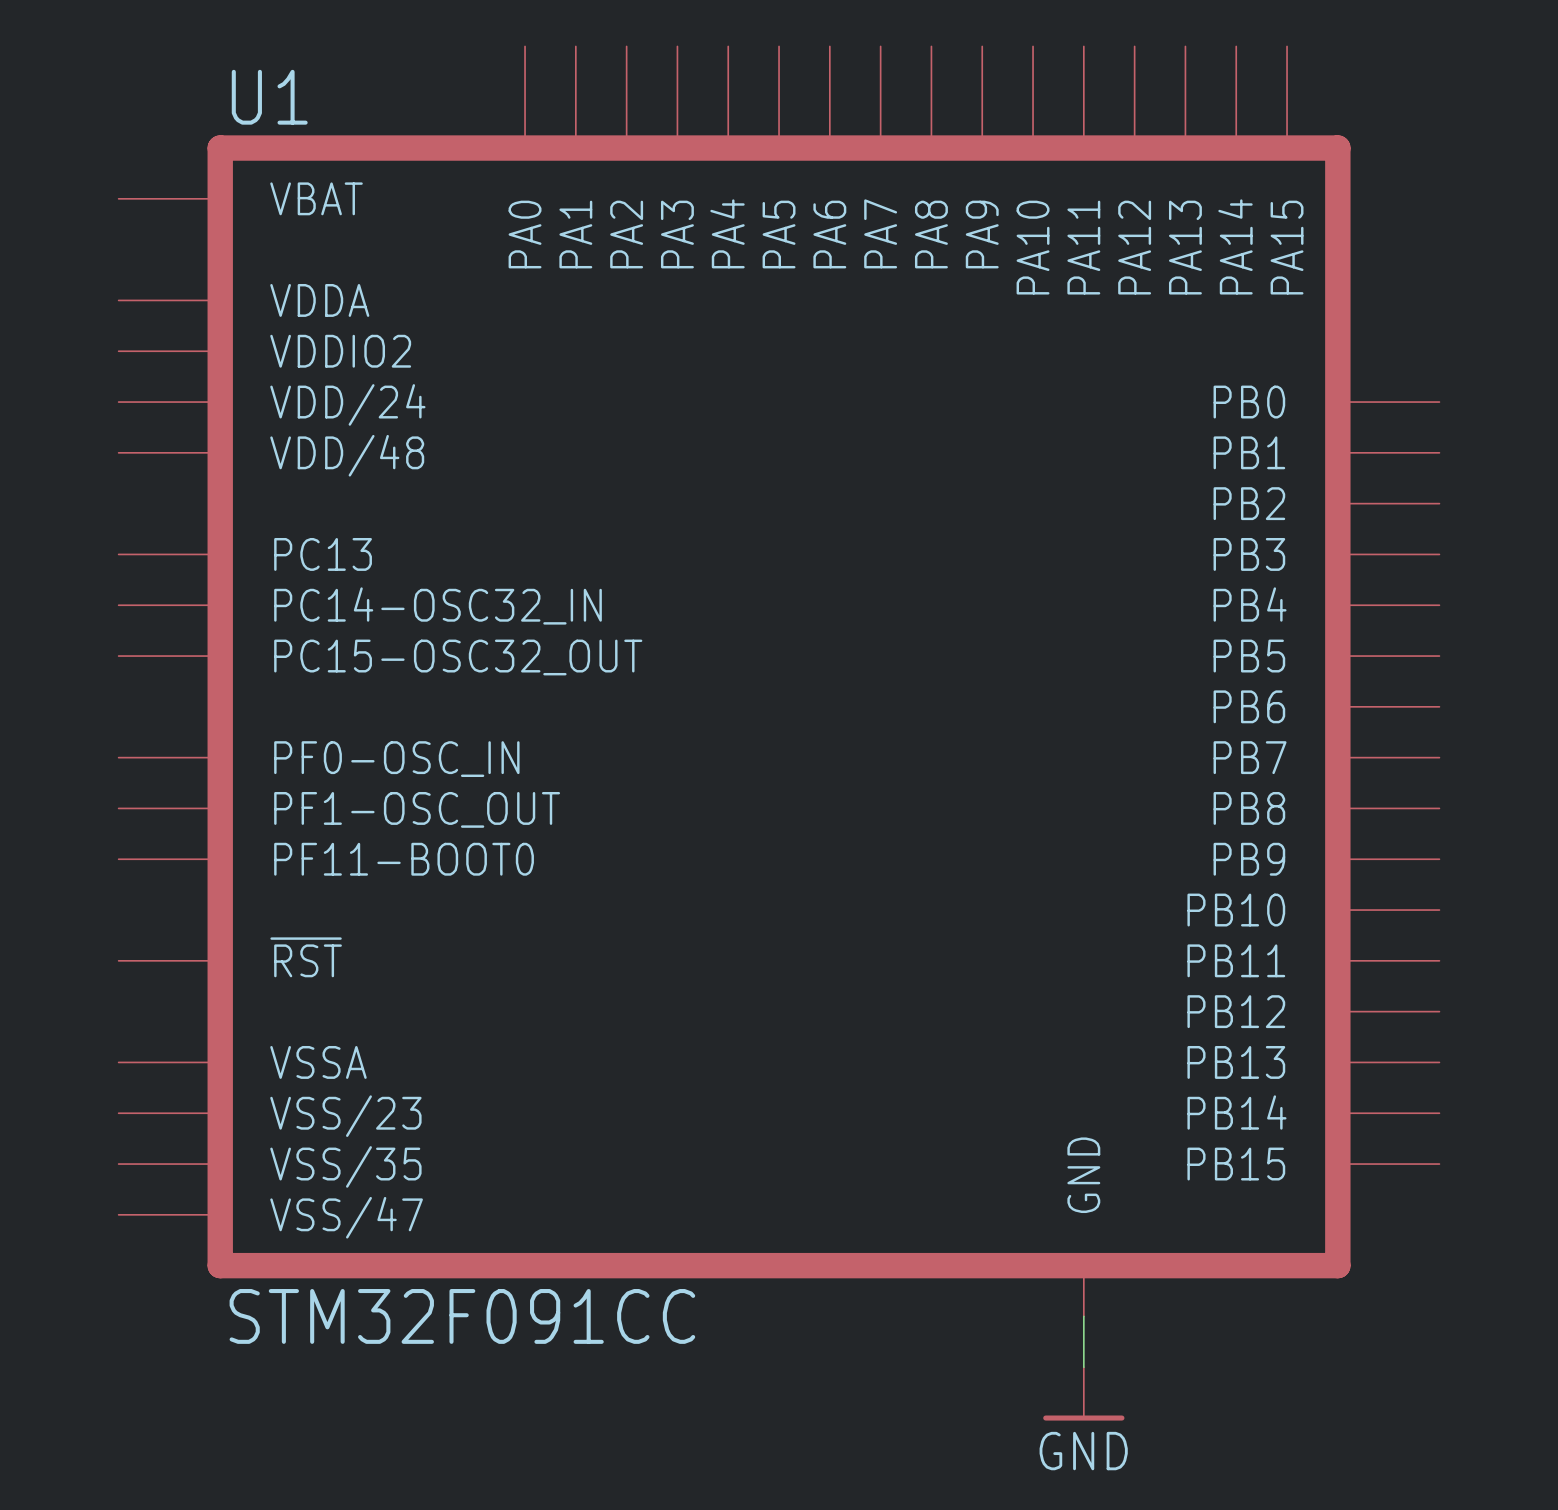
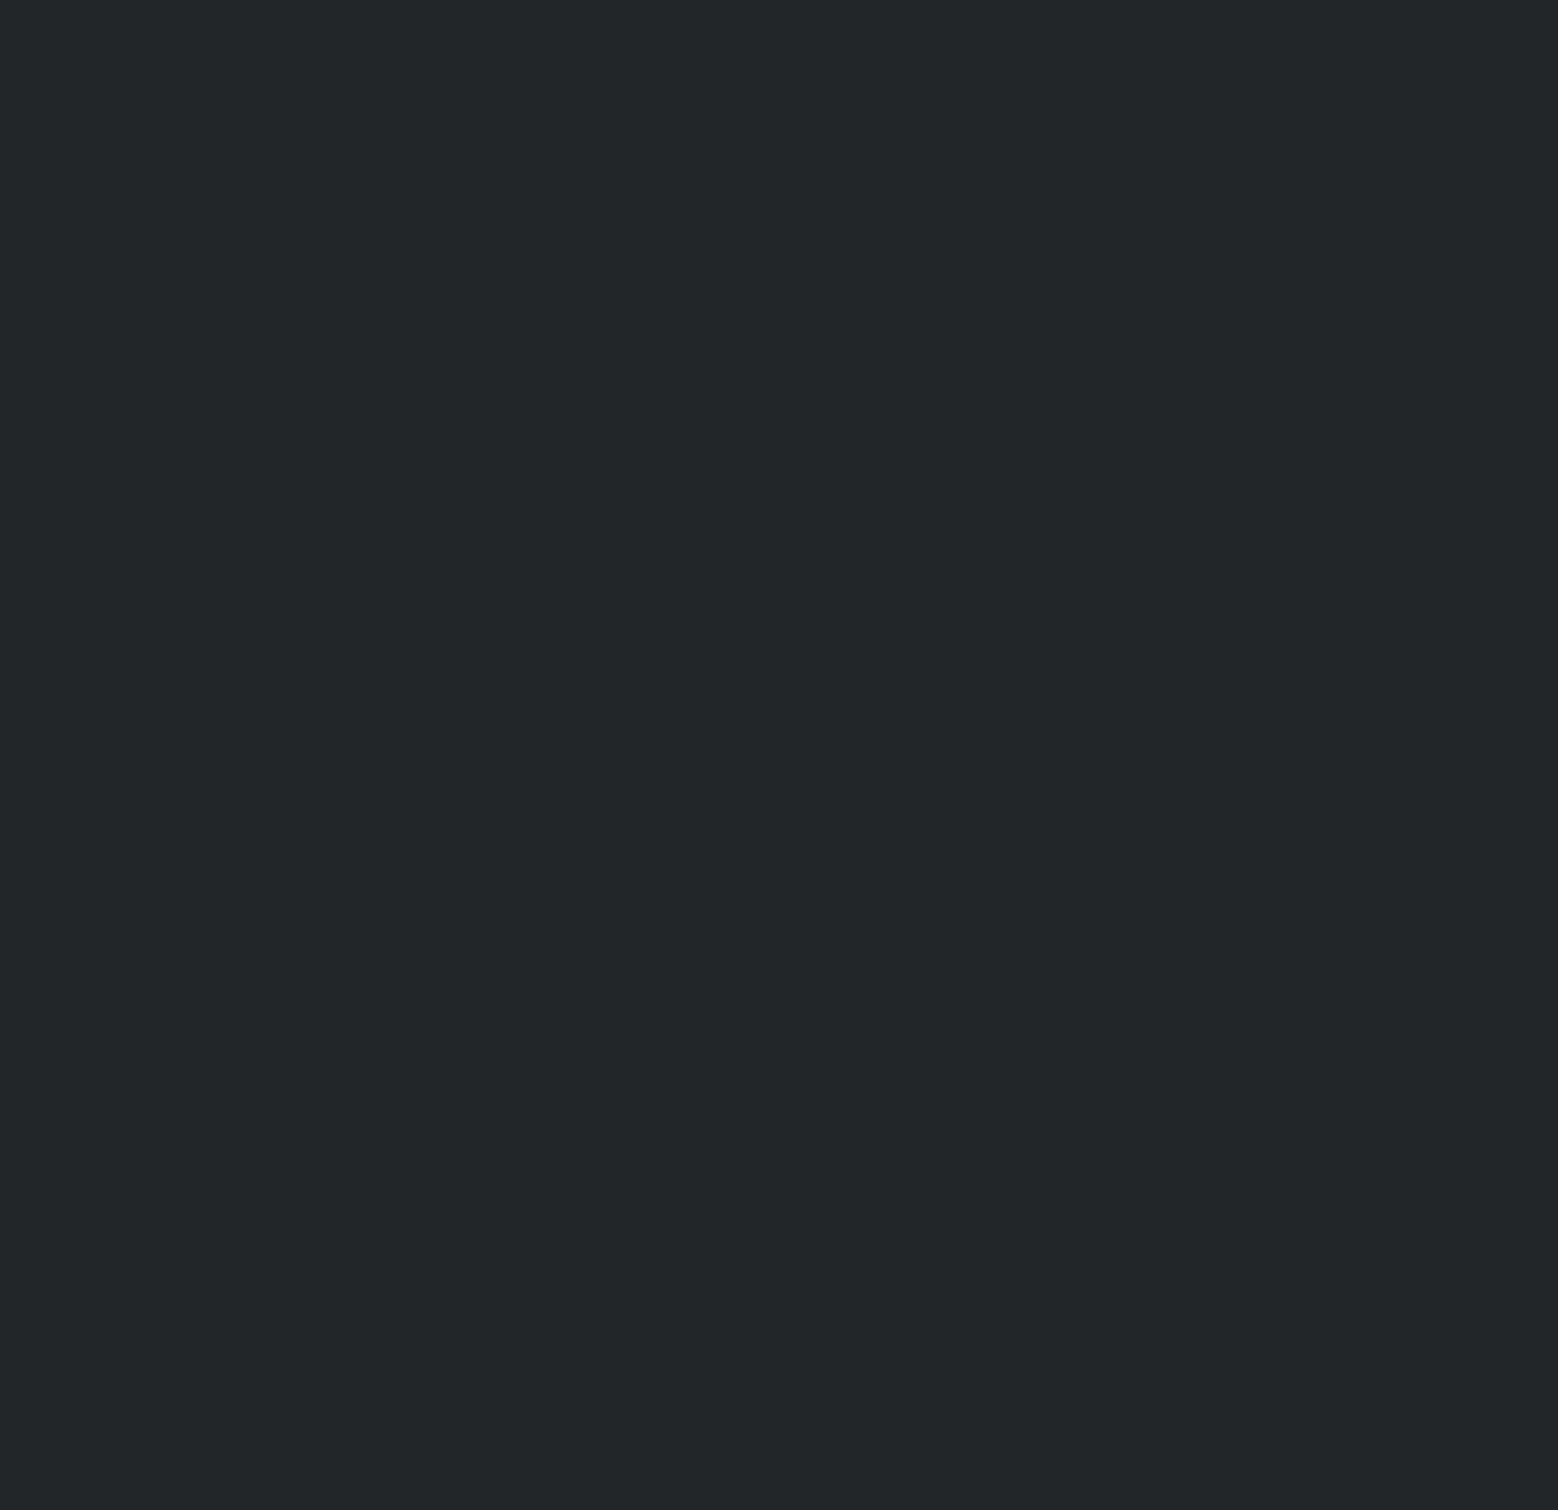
U1: STM32F091CC (779, 681) -> none
wire: (1083, 1316) (1083, 1367) -> none
power symbol: GND (1083, 1393) -> none

